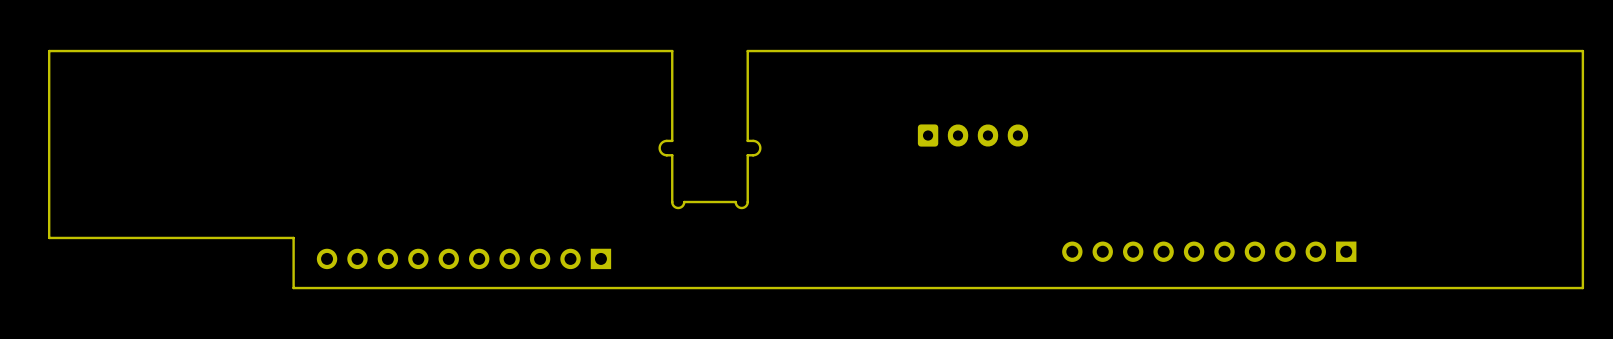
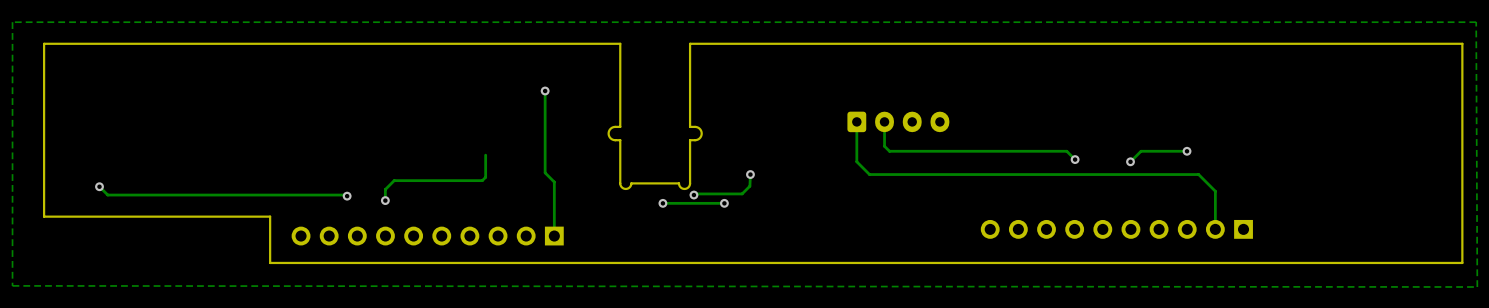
zone outline: none -> (1476, 22) (1477, 287) (12, 285) (12, 22) (1476, 22)
track: none -> (545, 91) (545, 172) (554, 182) (554, 236)
via: none -> (545, 91)
track: none -> (856, 121) (856, 161) (869, 174) (1198, 174) (1215, 191) (1215, 229)
track: none -> (884, 121) (884, 146) (889, 151) (1066, 151) (1075, 159)
track: none -> (1187, 151) (1141, 151) (1130, 161)
via: none -> (1187, 151)
track: none -> (485, 155) (485, 177) (482, 180) (394, 180) (385, 189) (385, 200)
via: none -> (1075, 159)
via: none -> (1130, 161)
track: none -> (750, 174) (749, 186) (742, 193) (693, 195)
via: none -> (750, 174)
track: none -> (99, 186) (107, 195) (347, 196)
via: none -> (99, 186)
via: none -> (693, 195)
via: none -> (347, 196)
via: none -> (385, 200)
via: none -> (662, 203)
track: none -> (724, 203) (662, 203)
via: none -> (724, 203)

